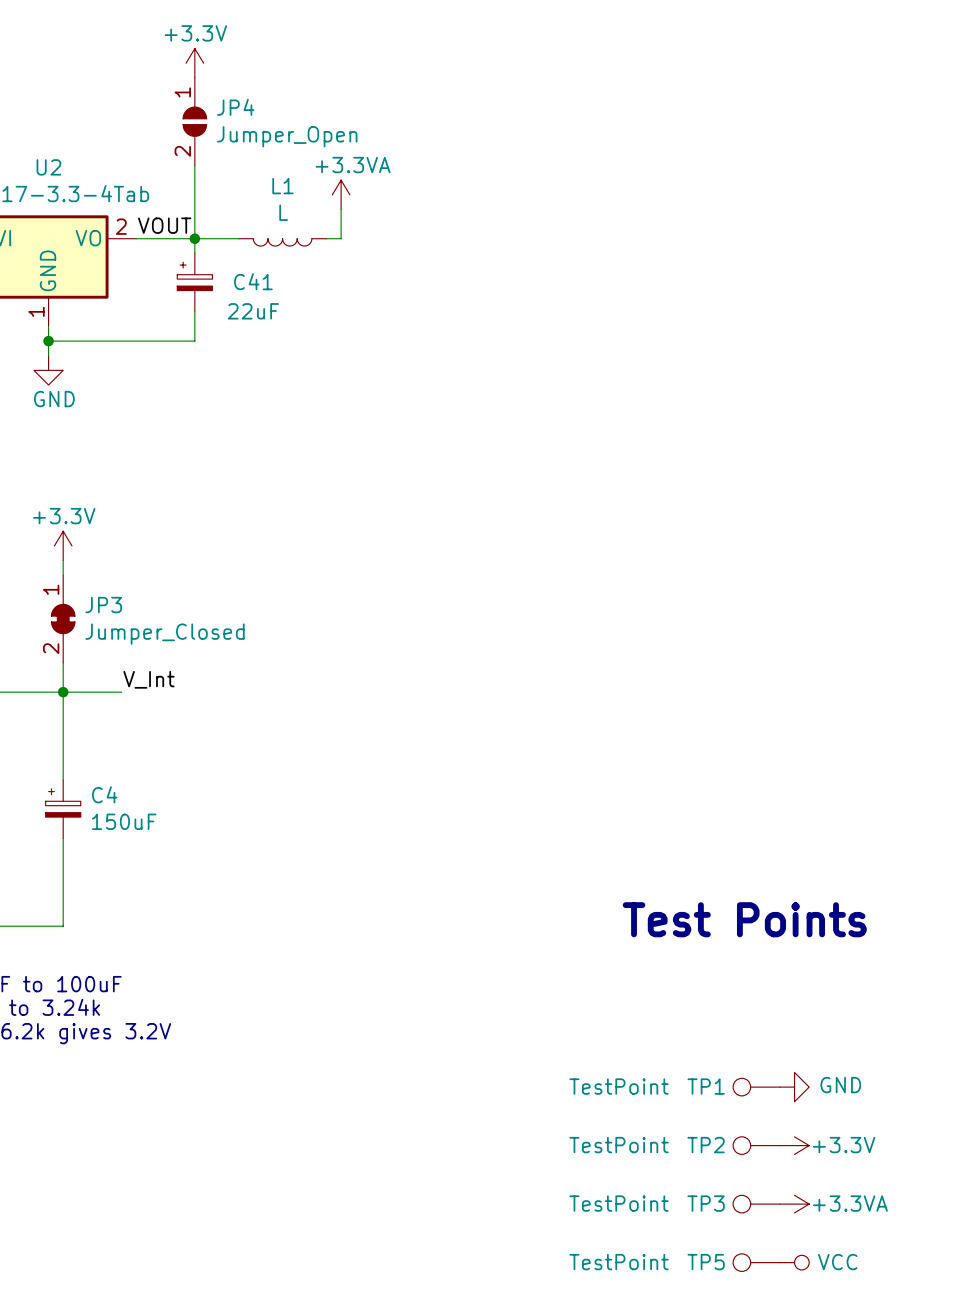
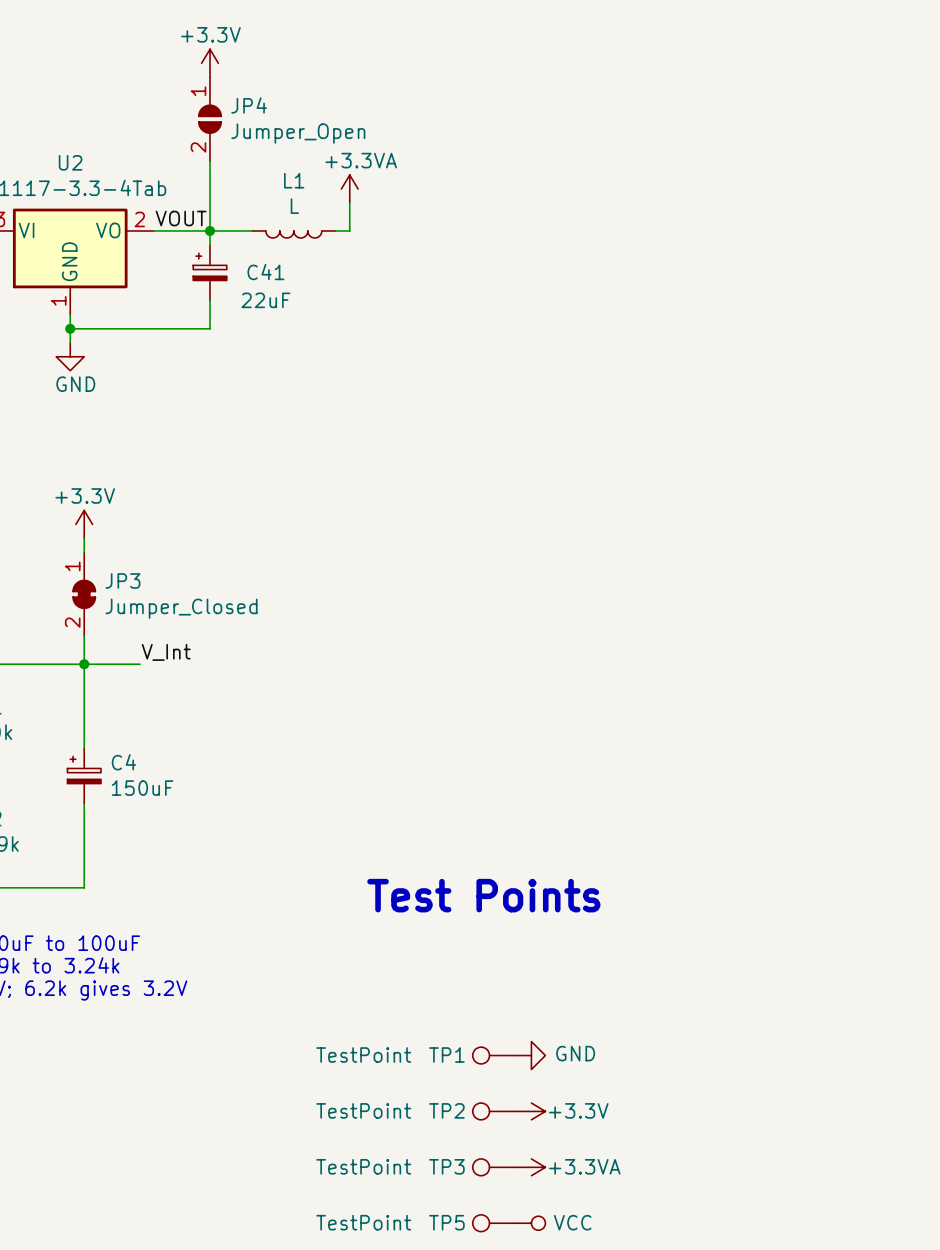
text position: Test Points (744, 919) -> Test Points (483, 895)
TP1 position: (756, 1087) -> (495, 1055)
power symbol position: GND (794, 1087) -> GND (531, 1055)
TP2 position: (756, 1145) -> (495, 1111)
power symbol position: +3.3V (794, 1145) -> +3.3V (531, 1111)
TP3 position: (756, 1204) -> (495, 1167)
power symbol position: +3.3VA (794, 1204) -> +3.3VA (531, 1167)
TP5 position: (756, 1262) -> (495, 1223)
power symbol position: VCC (794, 1262) -> VCC (531, 1223)

